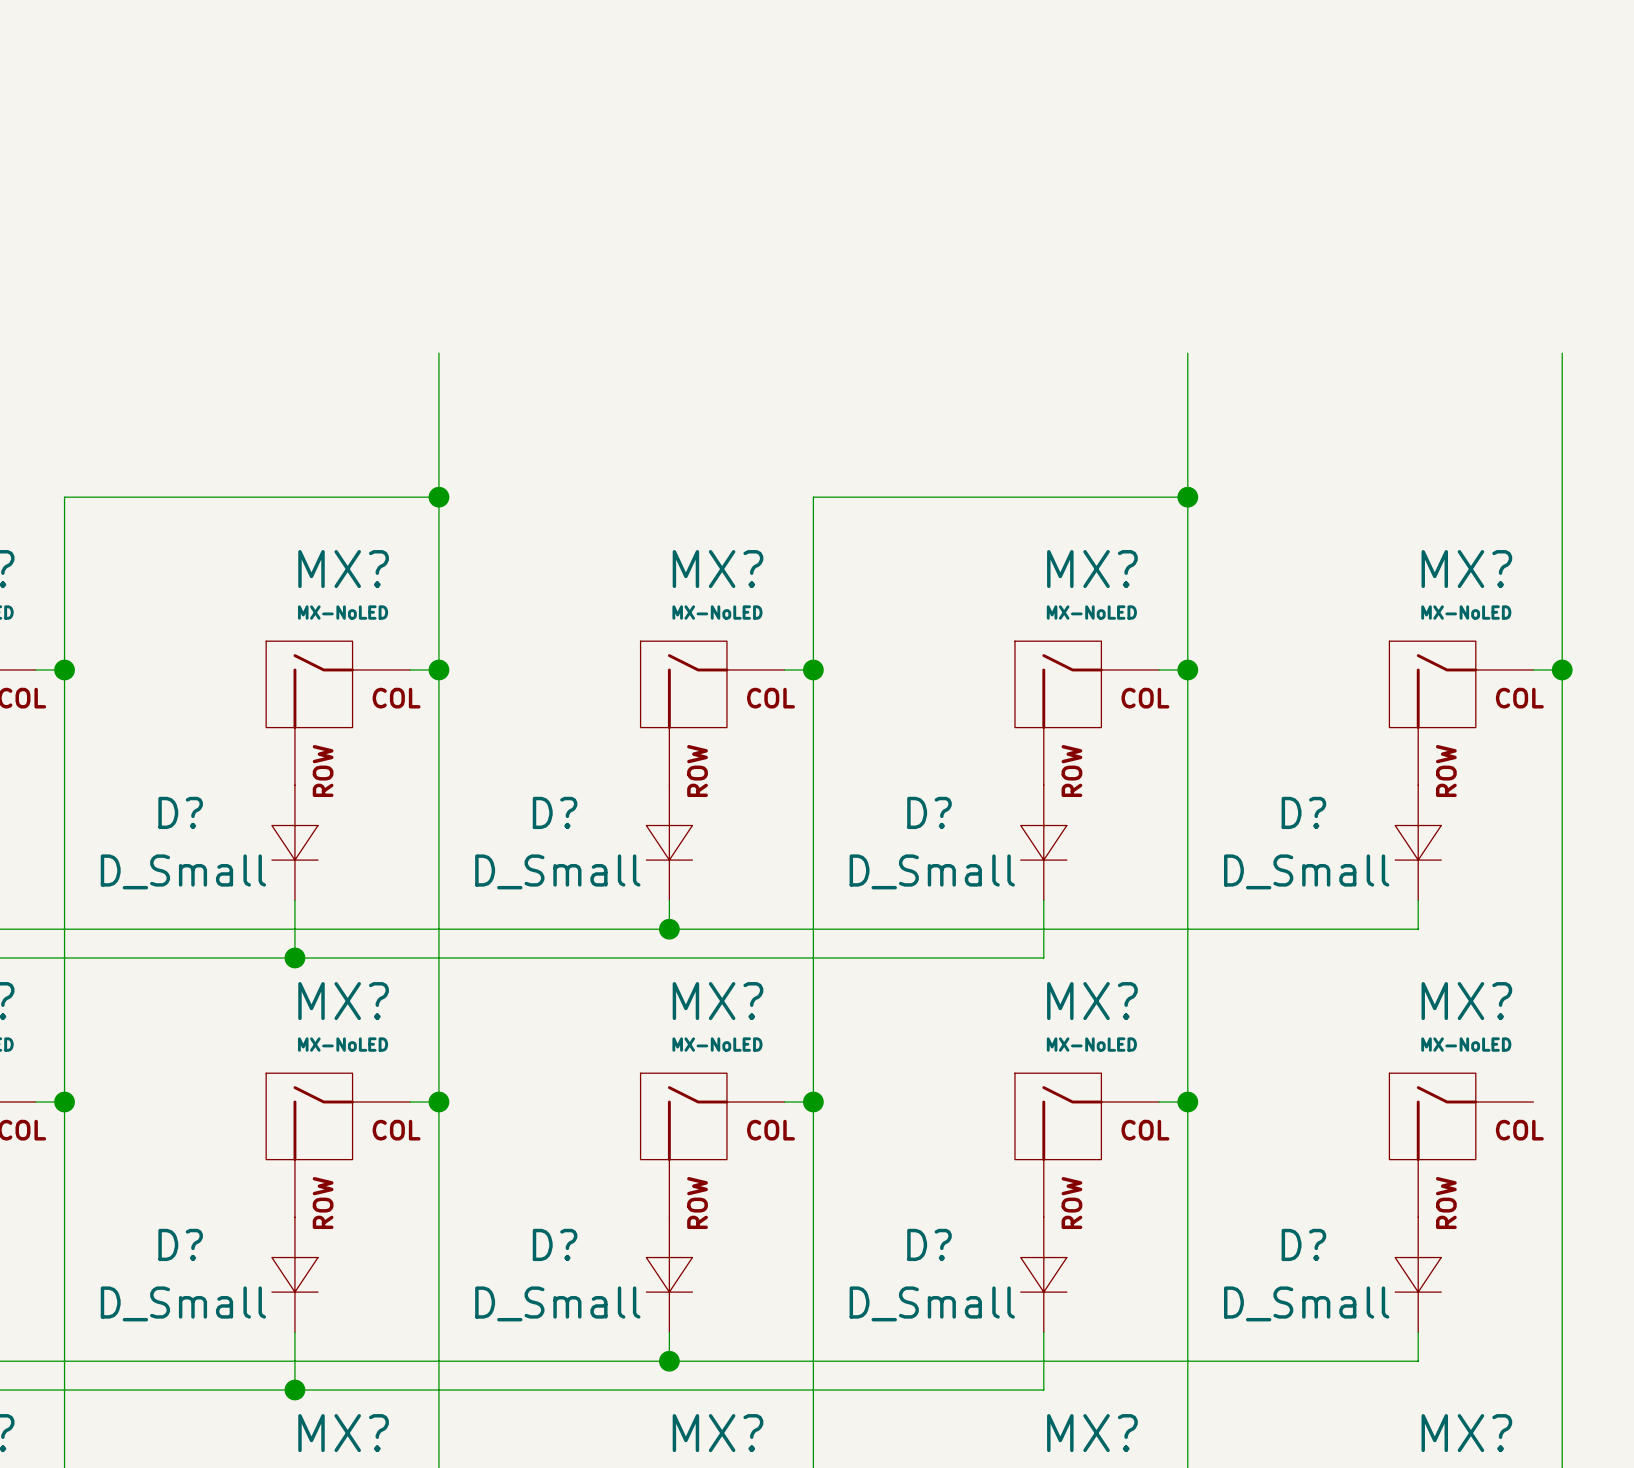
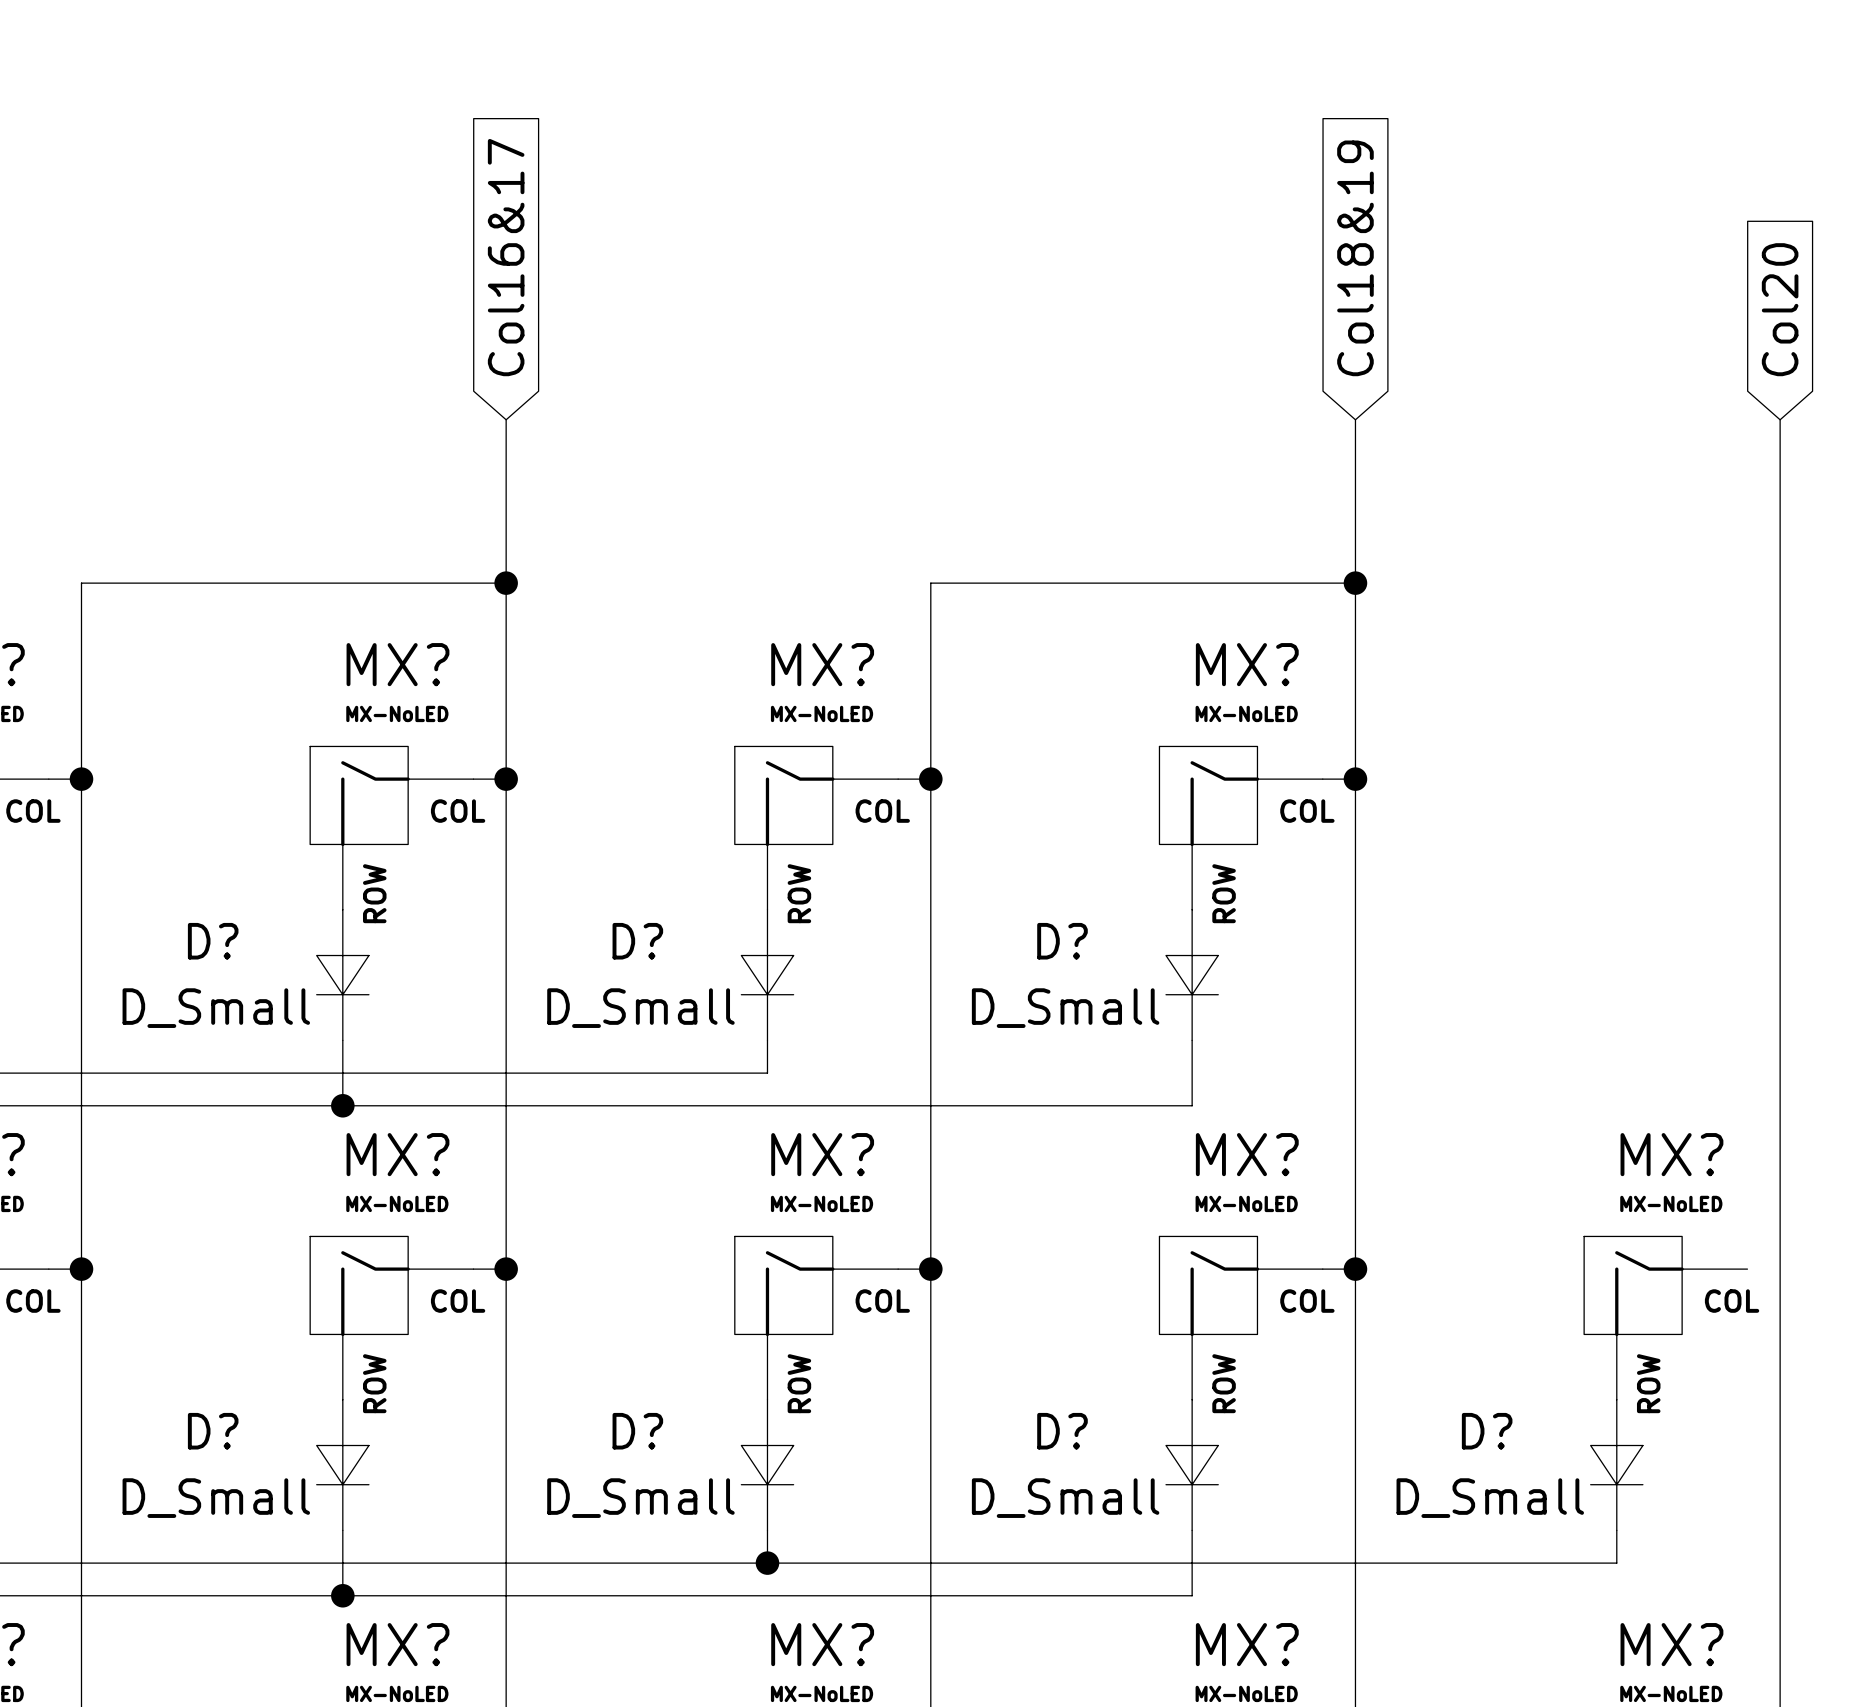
global label: none -> Col16&17 (506, 257)
global label: none -> Col18&19 (1355, 258)
global label: none -> Col20 (1780, 309)
wire: (1533, 669) (1562, 669) -> none
junction: (1562, 669) -> none
MX?: MX-NoLED (1461, 713) -> none
D?: D_Small (1418, 842) -> none
wire: (1418, 900) (1418, 929) (669, 929) -> none
junction: (669, 929) -> none

